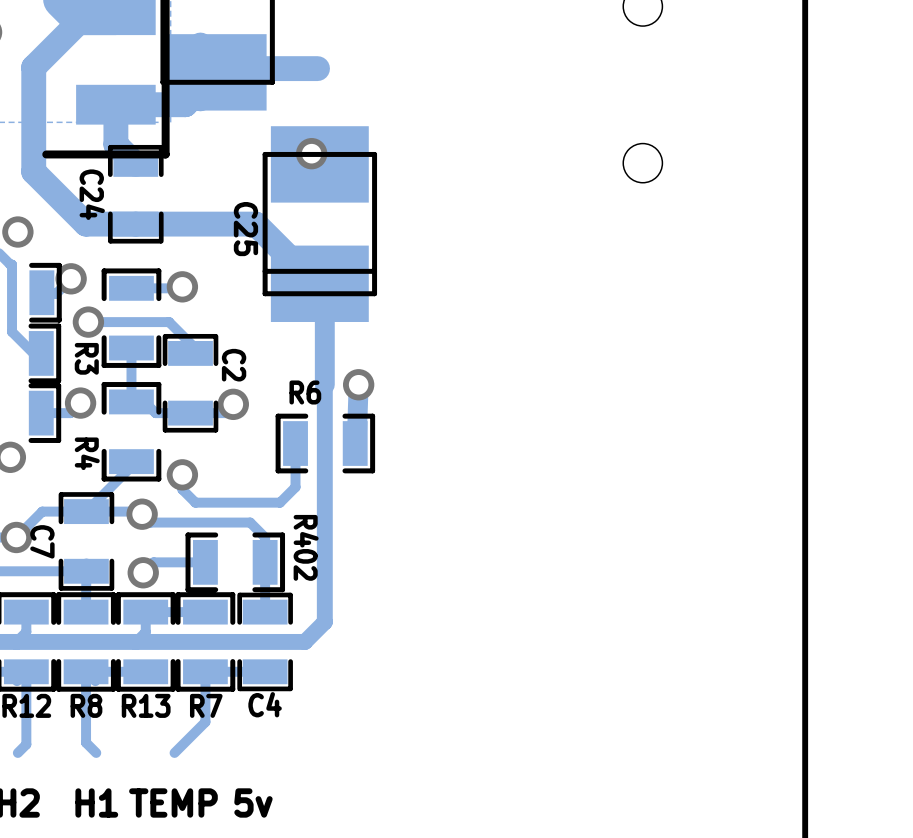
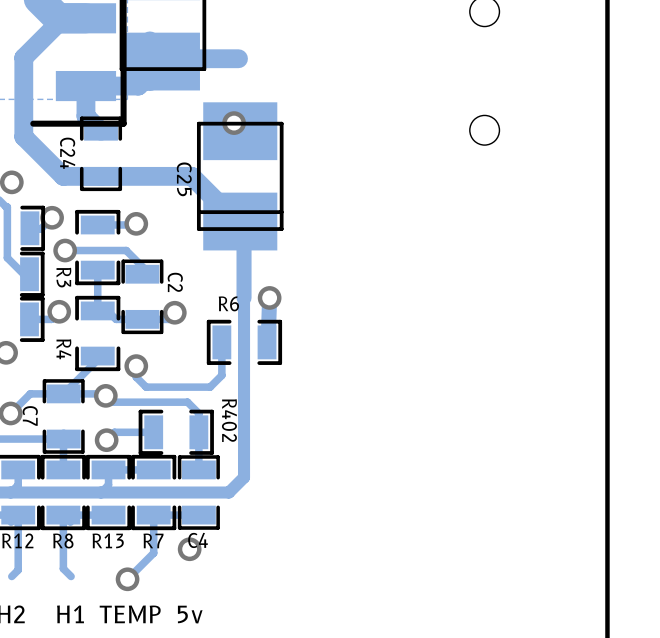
via: none -> (189, 549)
via: none -> (127, 579)

